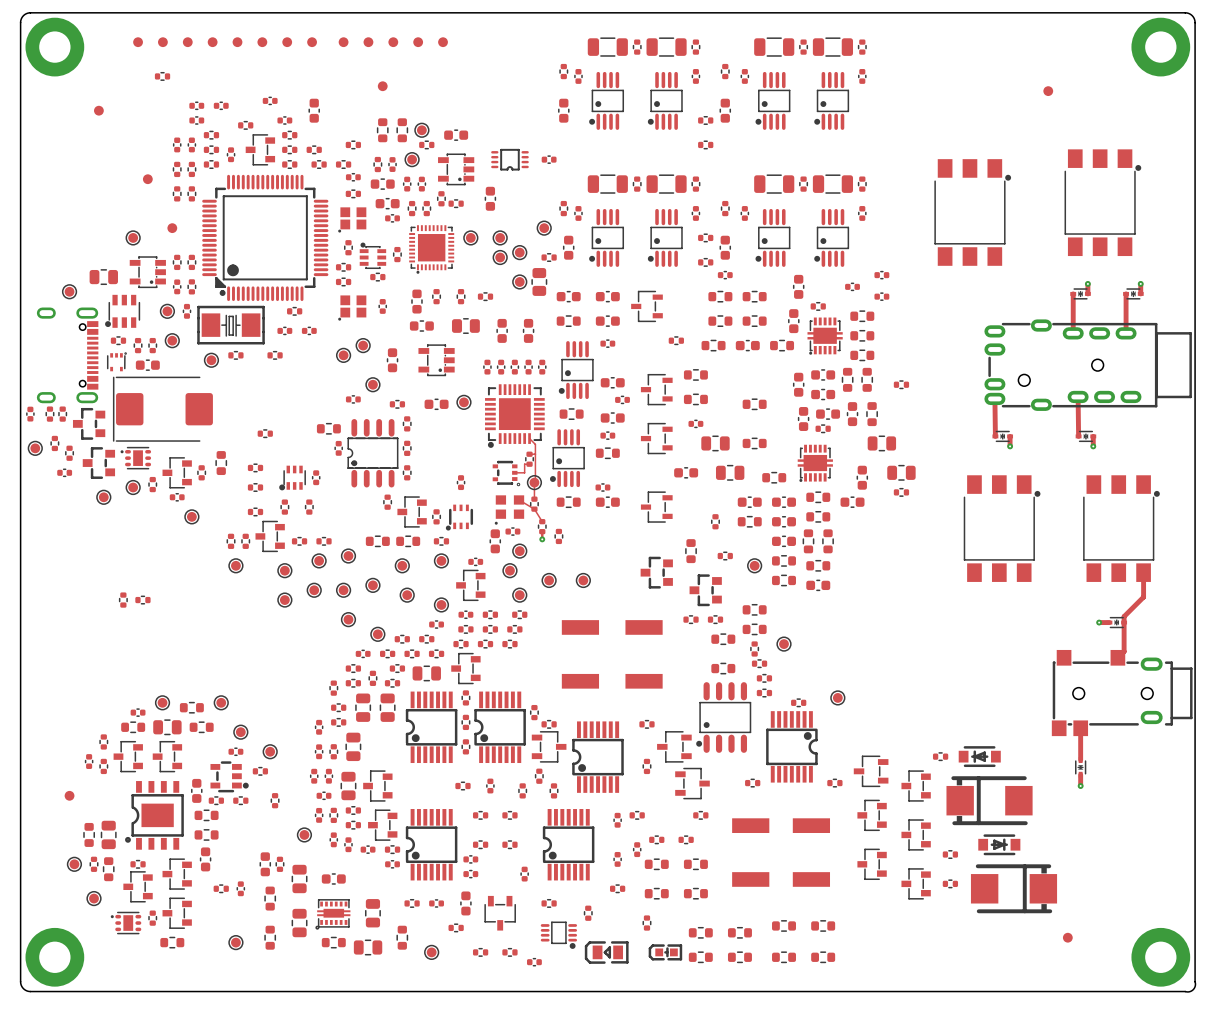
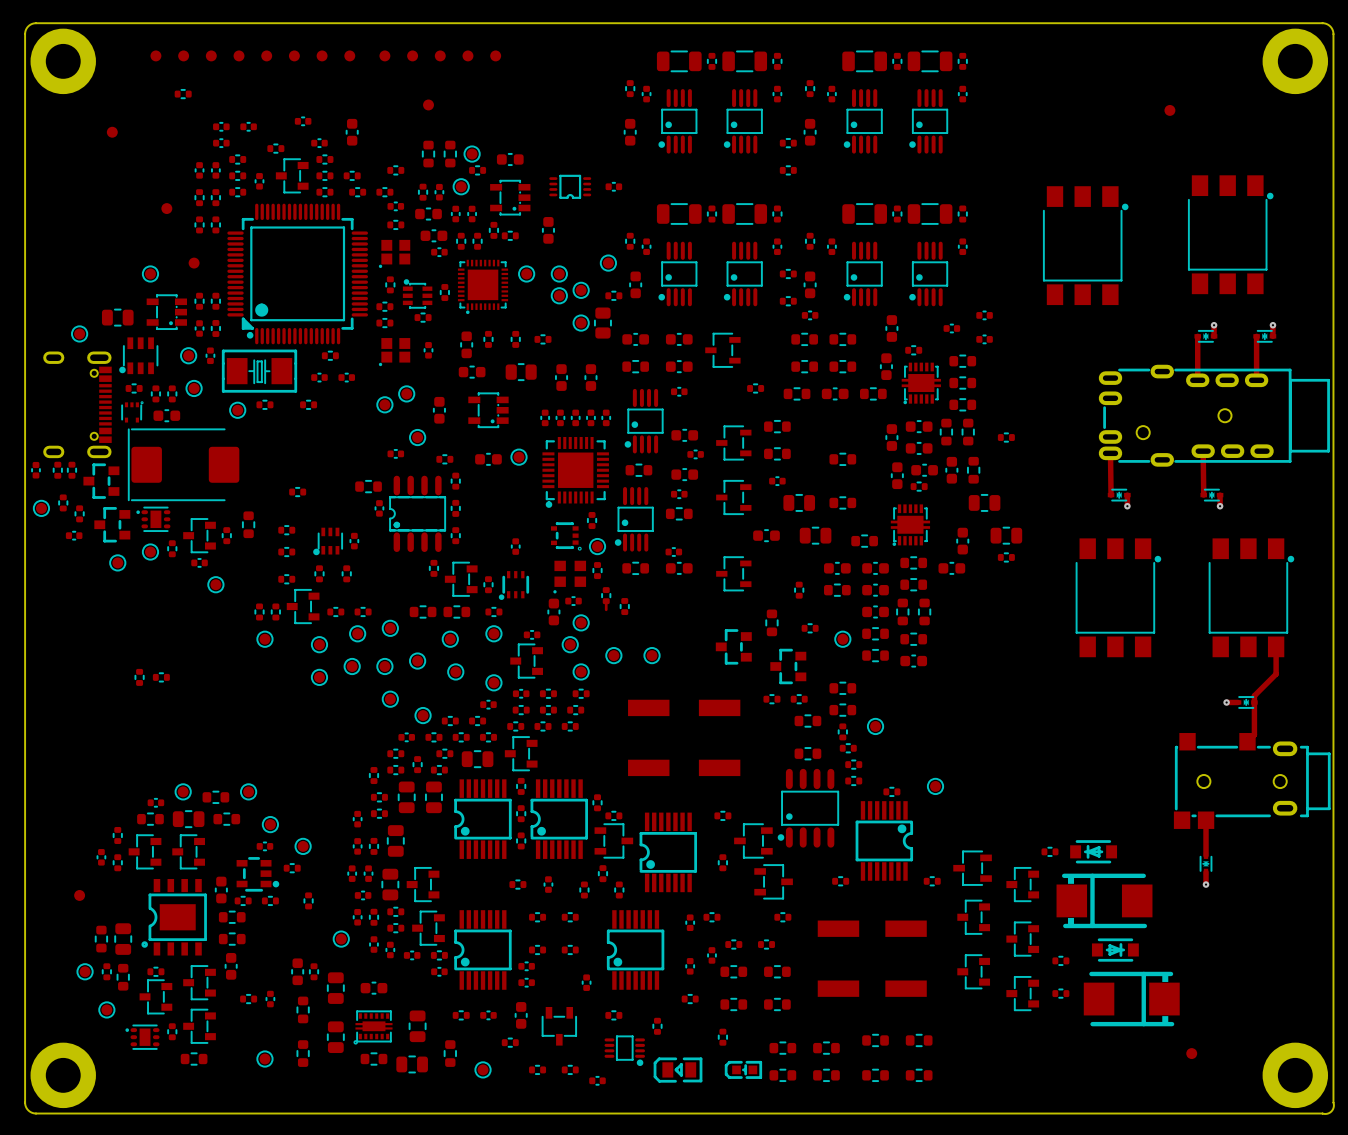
top track: (529, 438) (535, 444) (534, 499) -> none
top track: (529, 454) (535, 454) -> none
top track: (529, 464) (524, 464) (524, 472) (514, 472) -> none
top track: (519, 499) (534, 509) (542, 521) -> none
via: (542, 539) -> none

